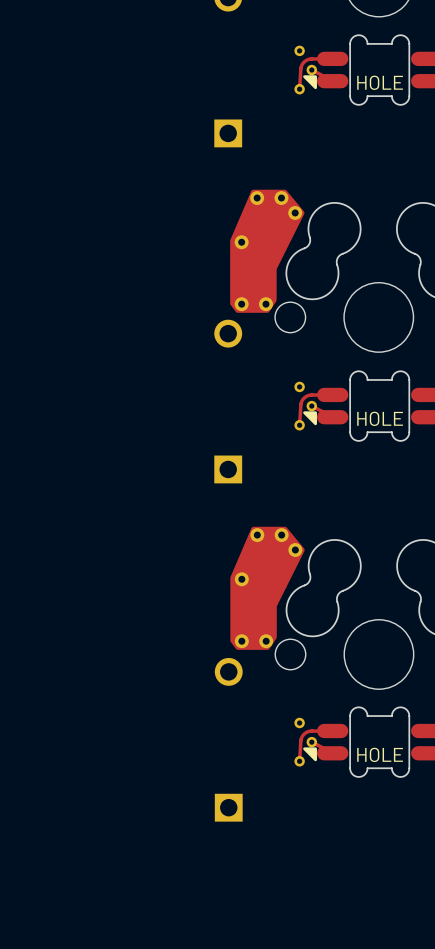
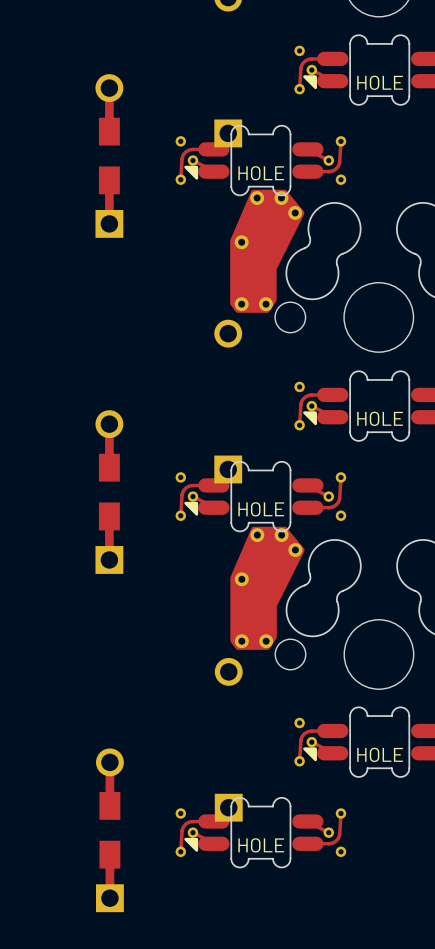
part: none -> (109, 156)
part: none -> (260, 160)
part: none -> (109, 492)
part: none -> (260, 496)
part: none -> (109, 830)
part: none -> (260, 832)

